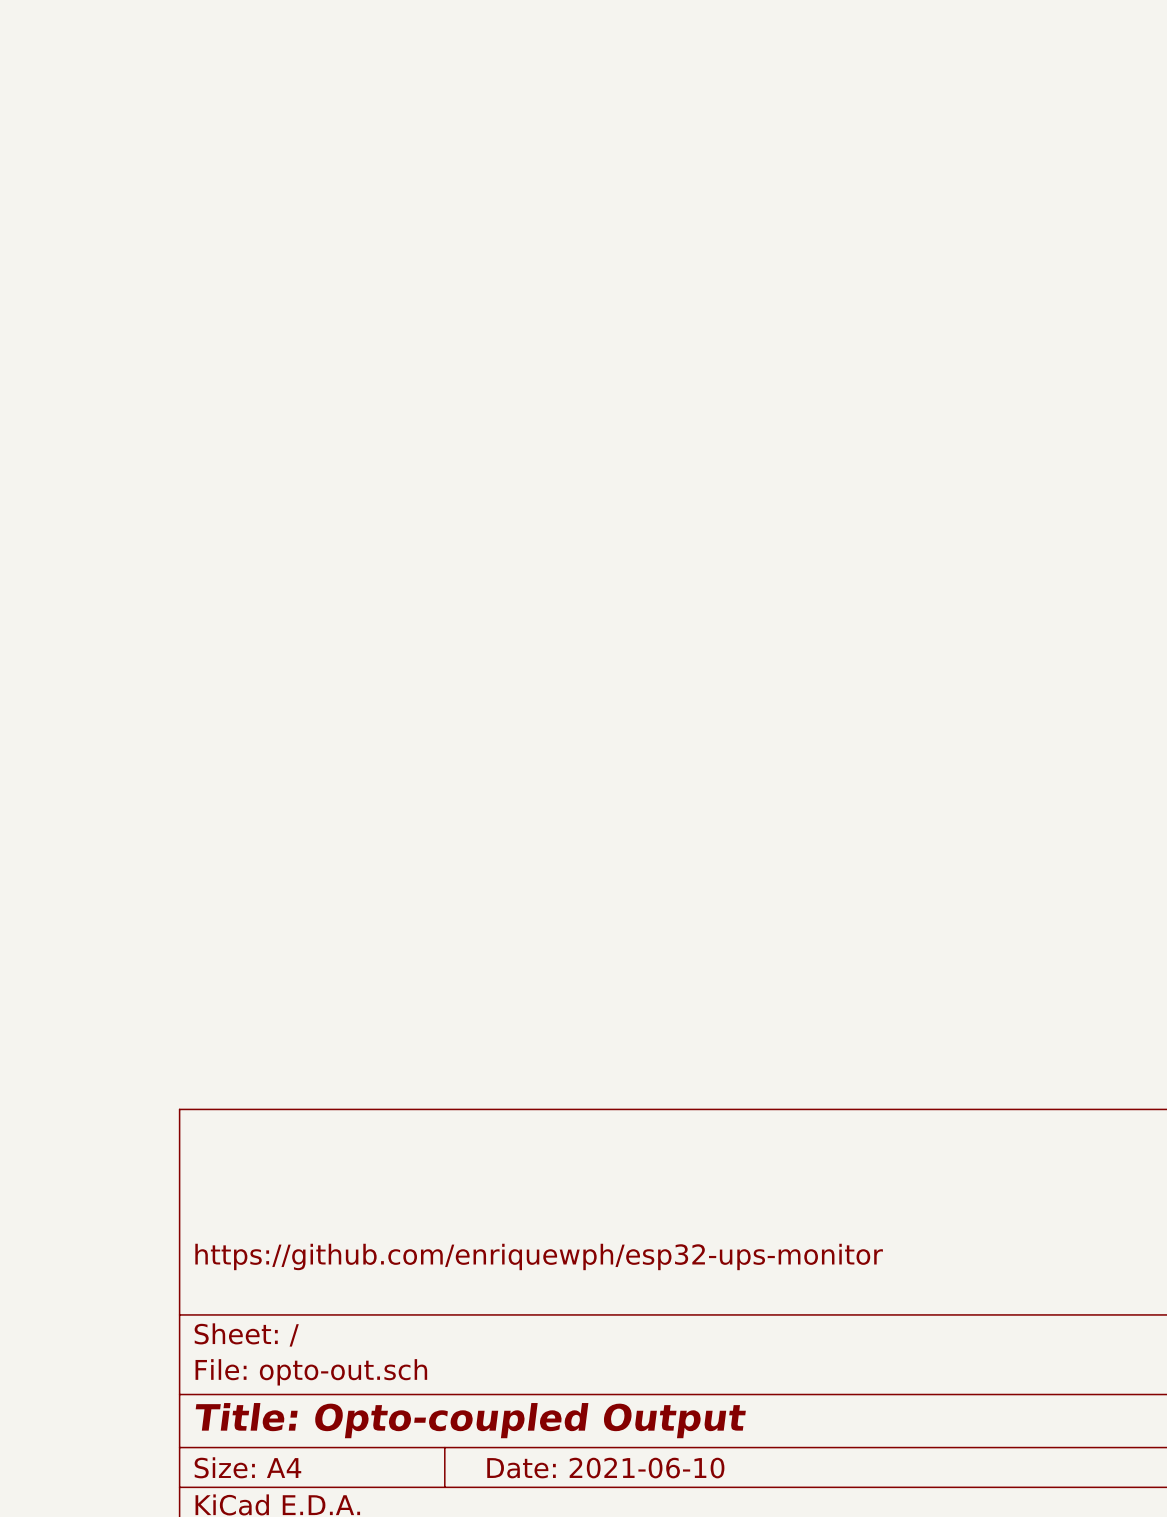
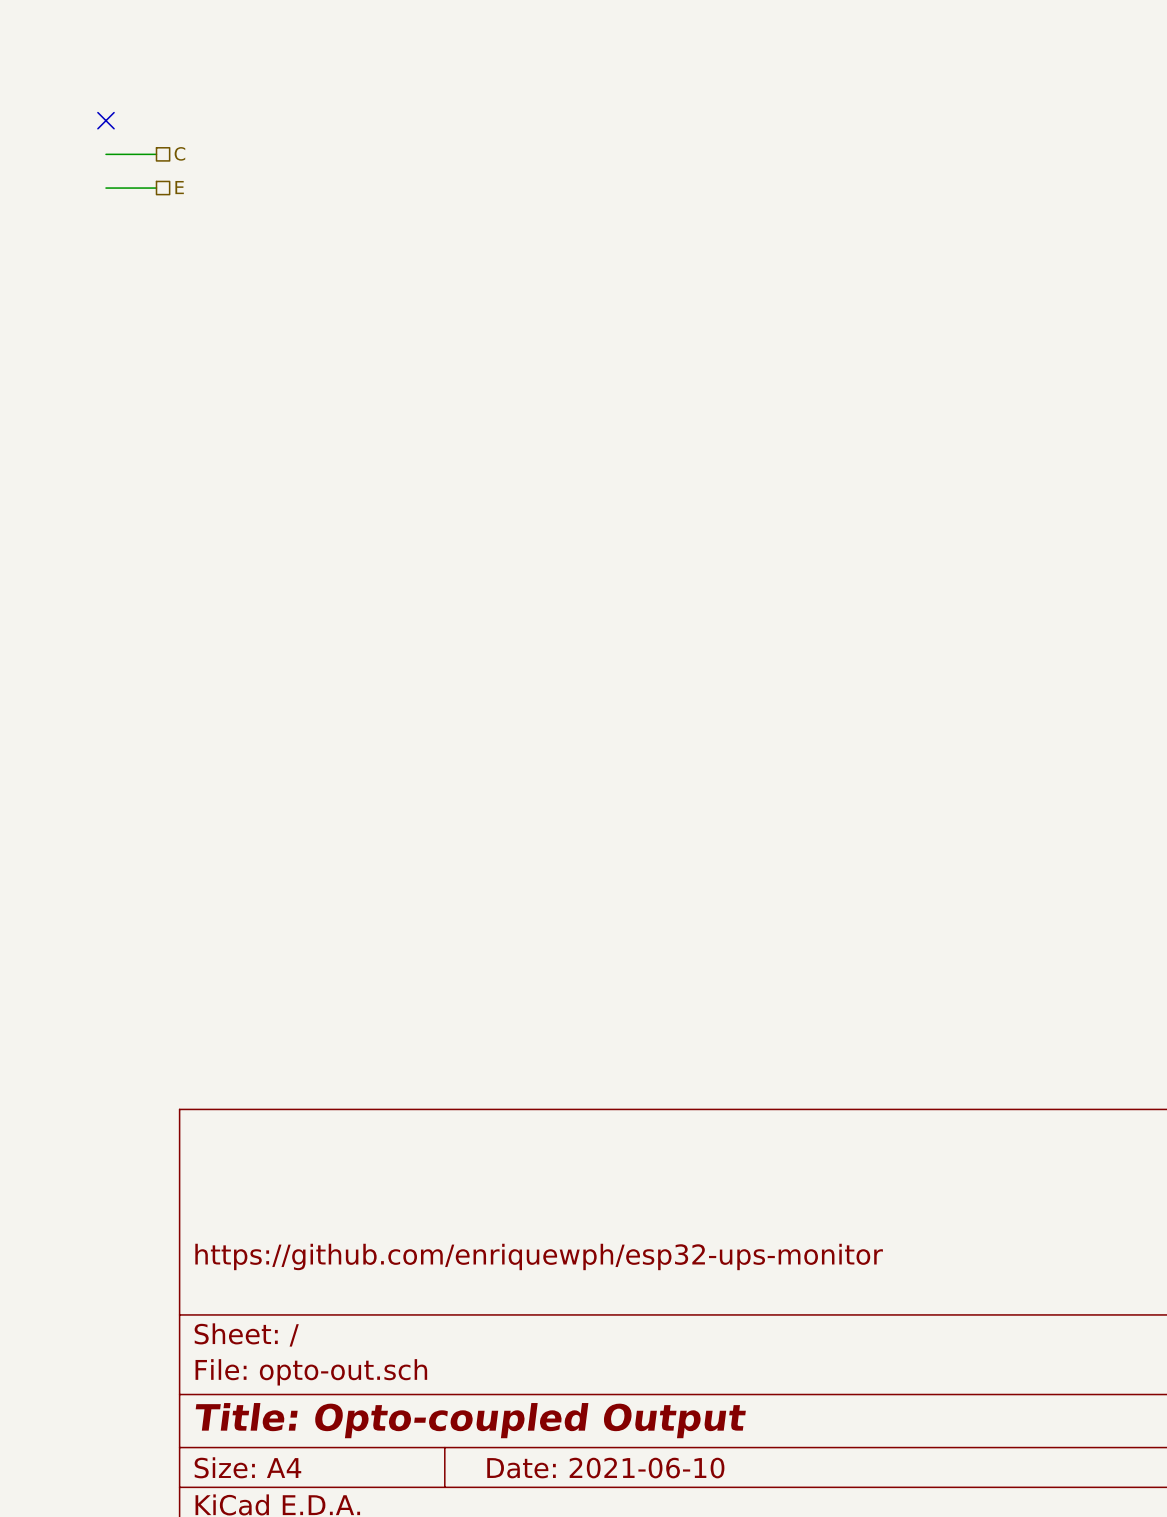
no-connect mark: none -> (105, 120)
hierarchical label: none -> C (179, 153)
wire: none -> (105, 154) (156, 154)
hierarchical label: none -> E (179, 187)
wire: none -> (105, 188) (156, 188)

